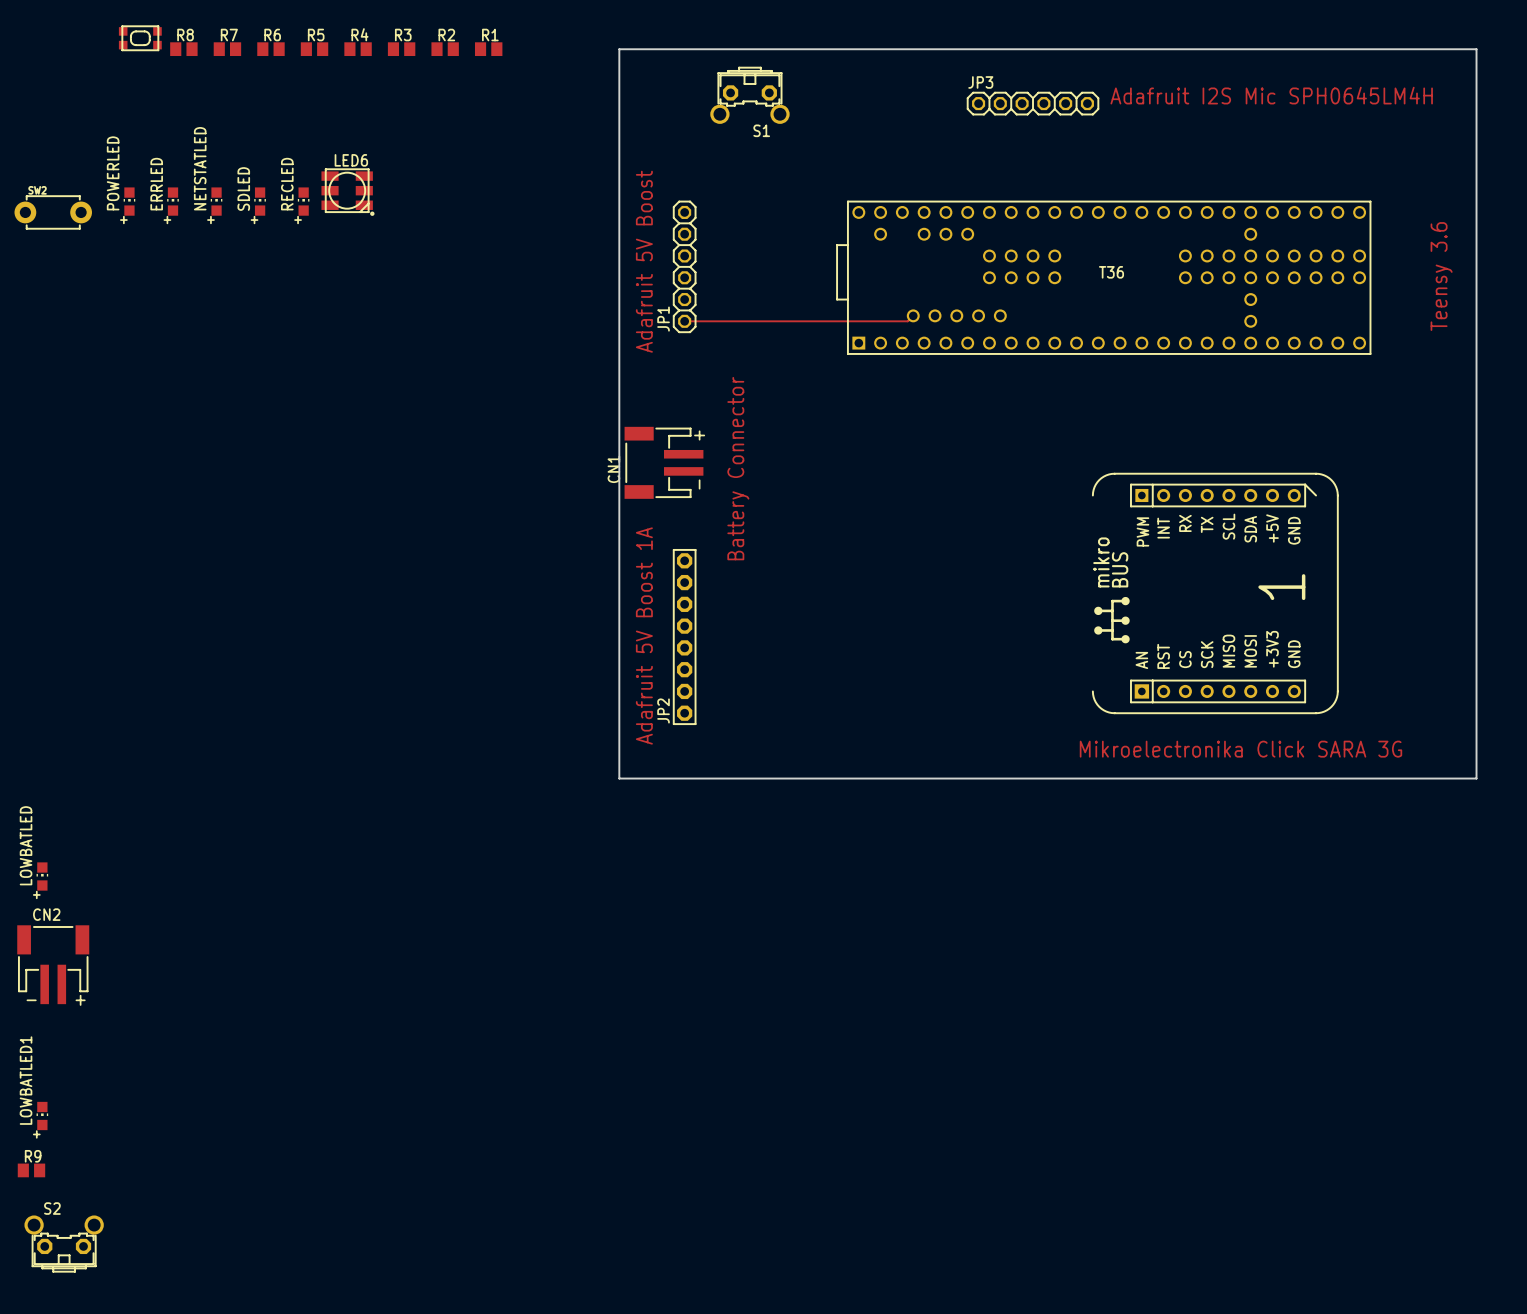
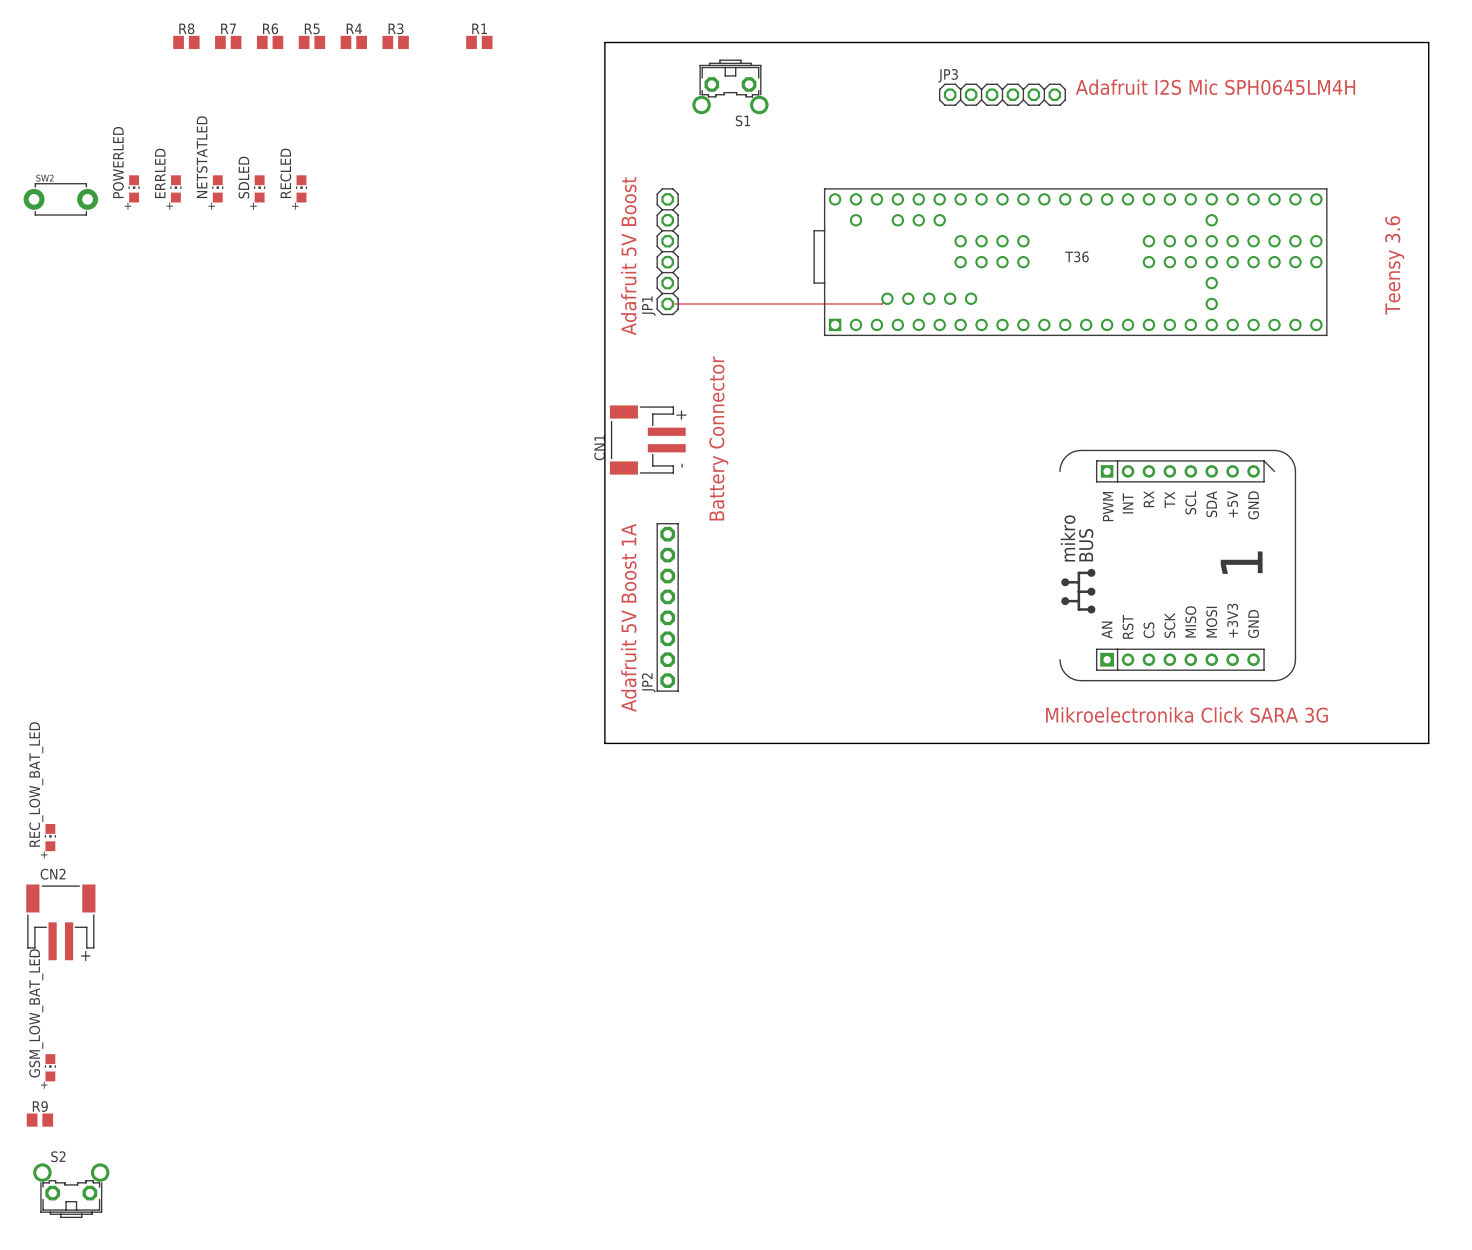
part: (140, 38) -> none
R2: (445, 49) -> none
LED6: (347, 192) -> none
LOWBATLED name: LOWBATLED (26, 845) -> REC_LOW_BAT_LED (36, 784)
LOWBATLED1 name: LOWBATLED1 (26, 1080) -> GSM_LOW_BAT_LED (36, 1013)

